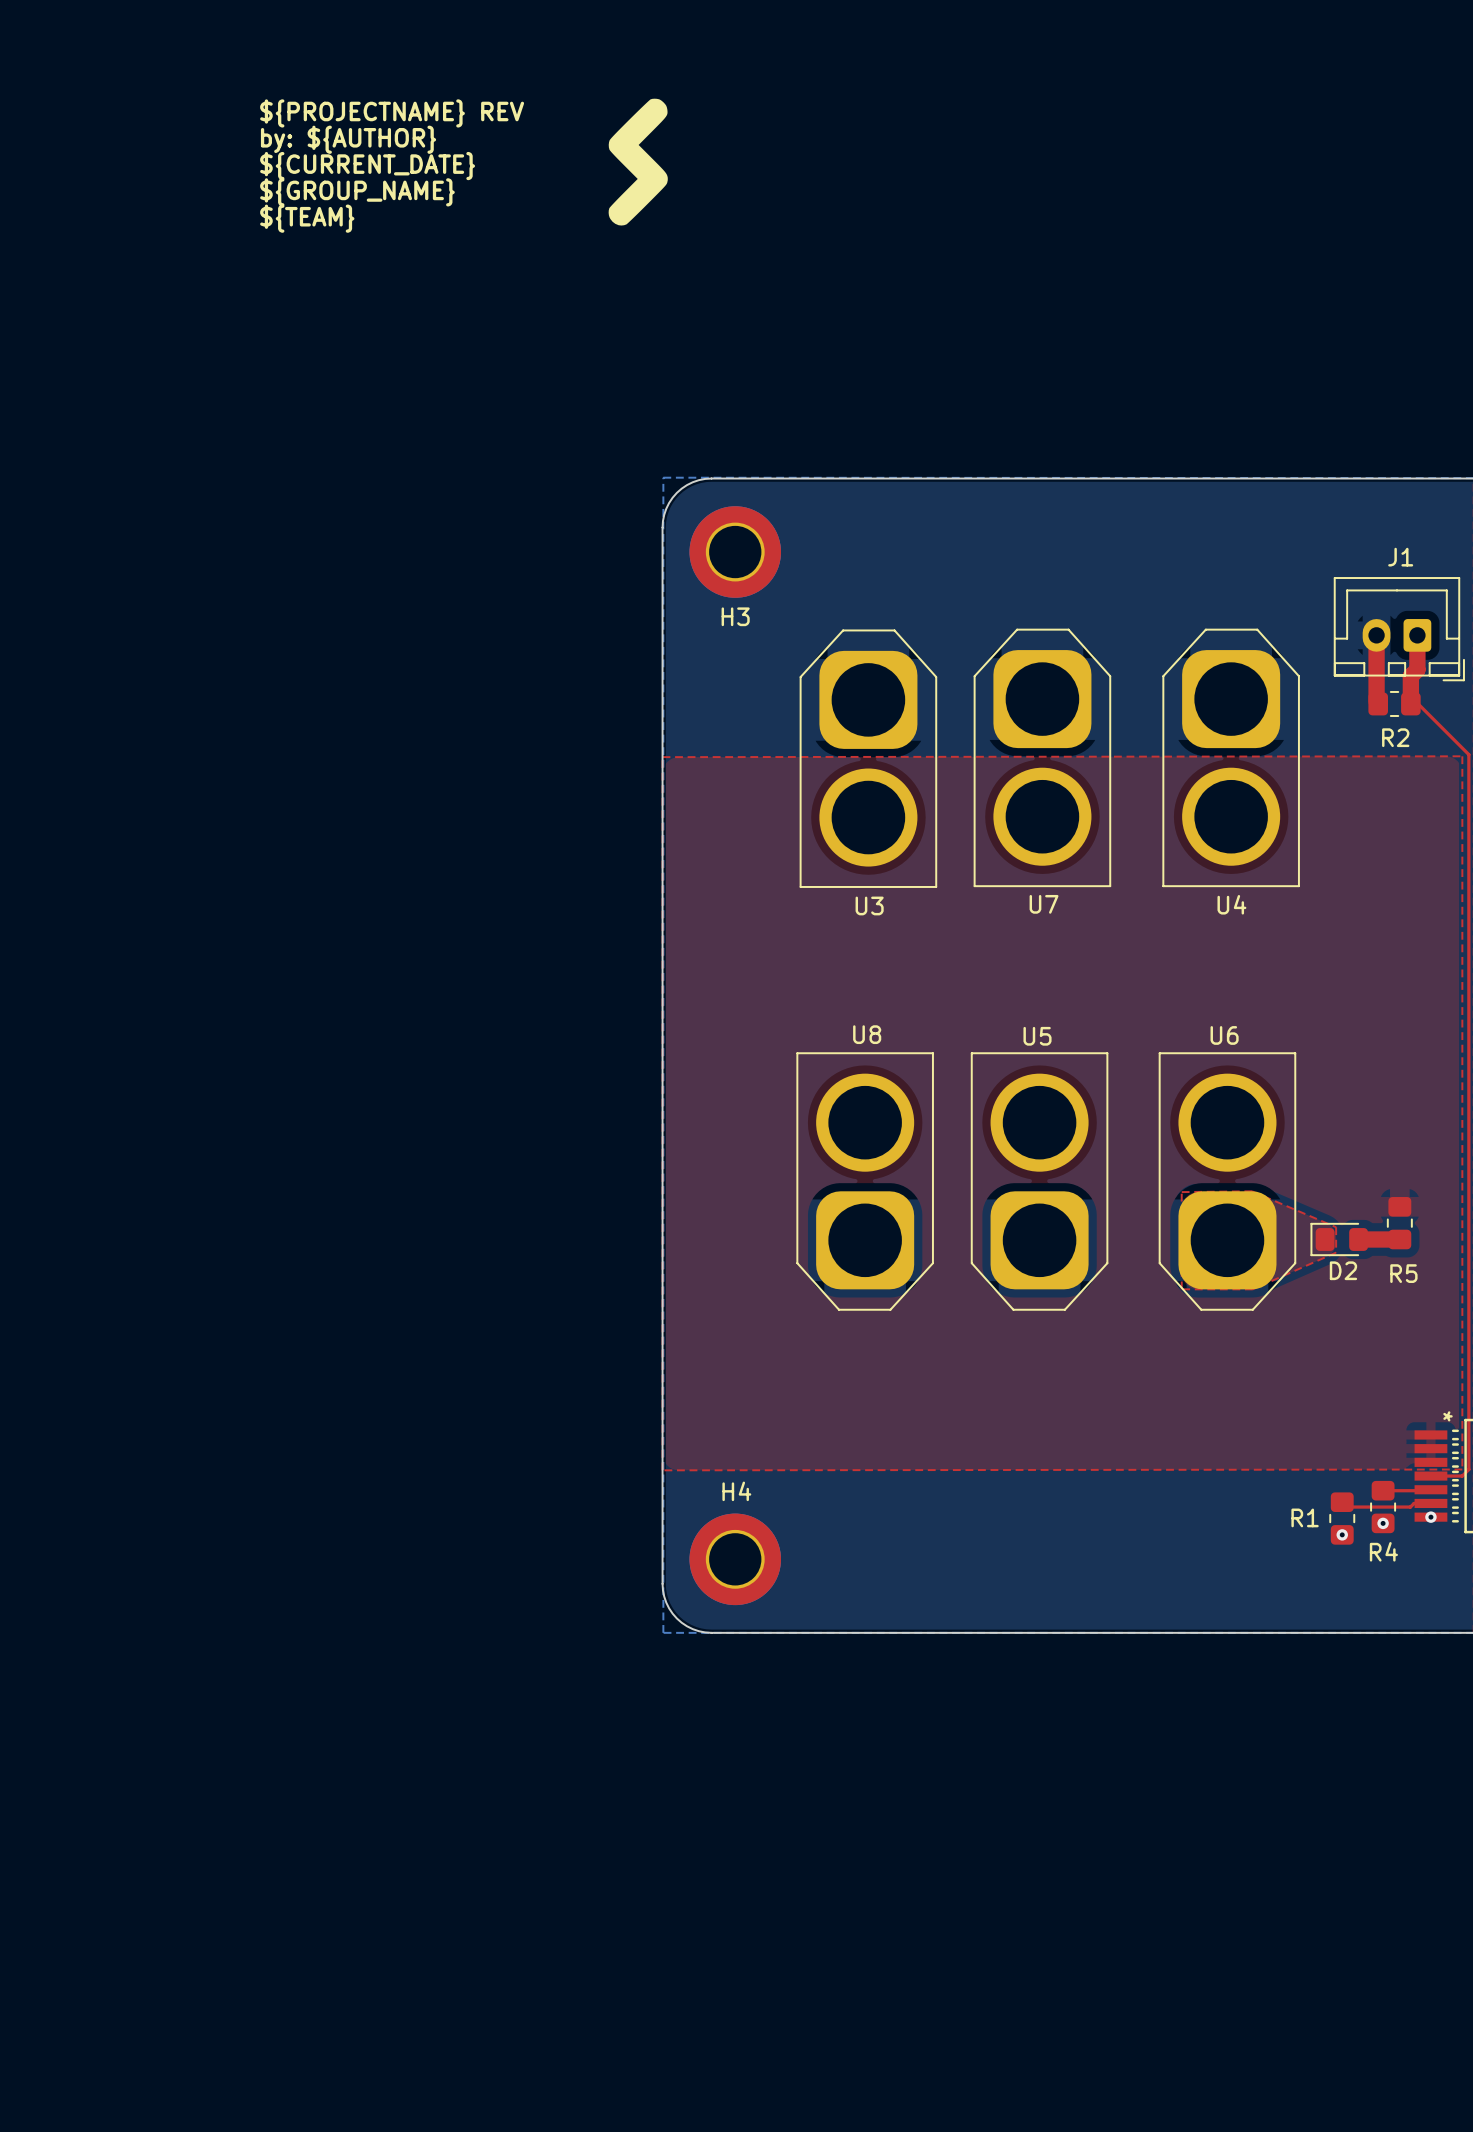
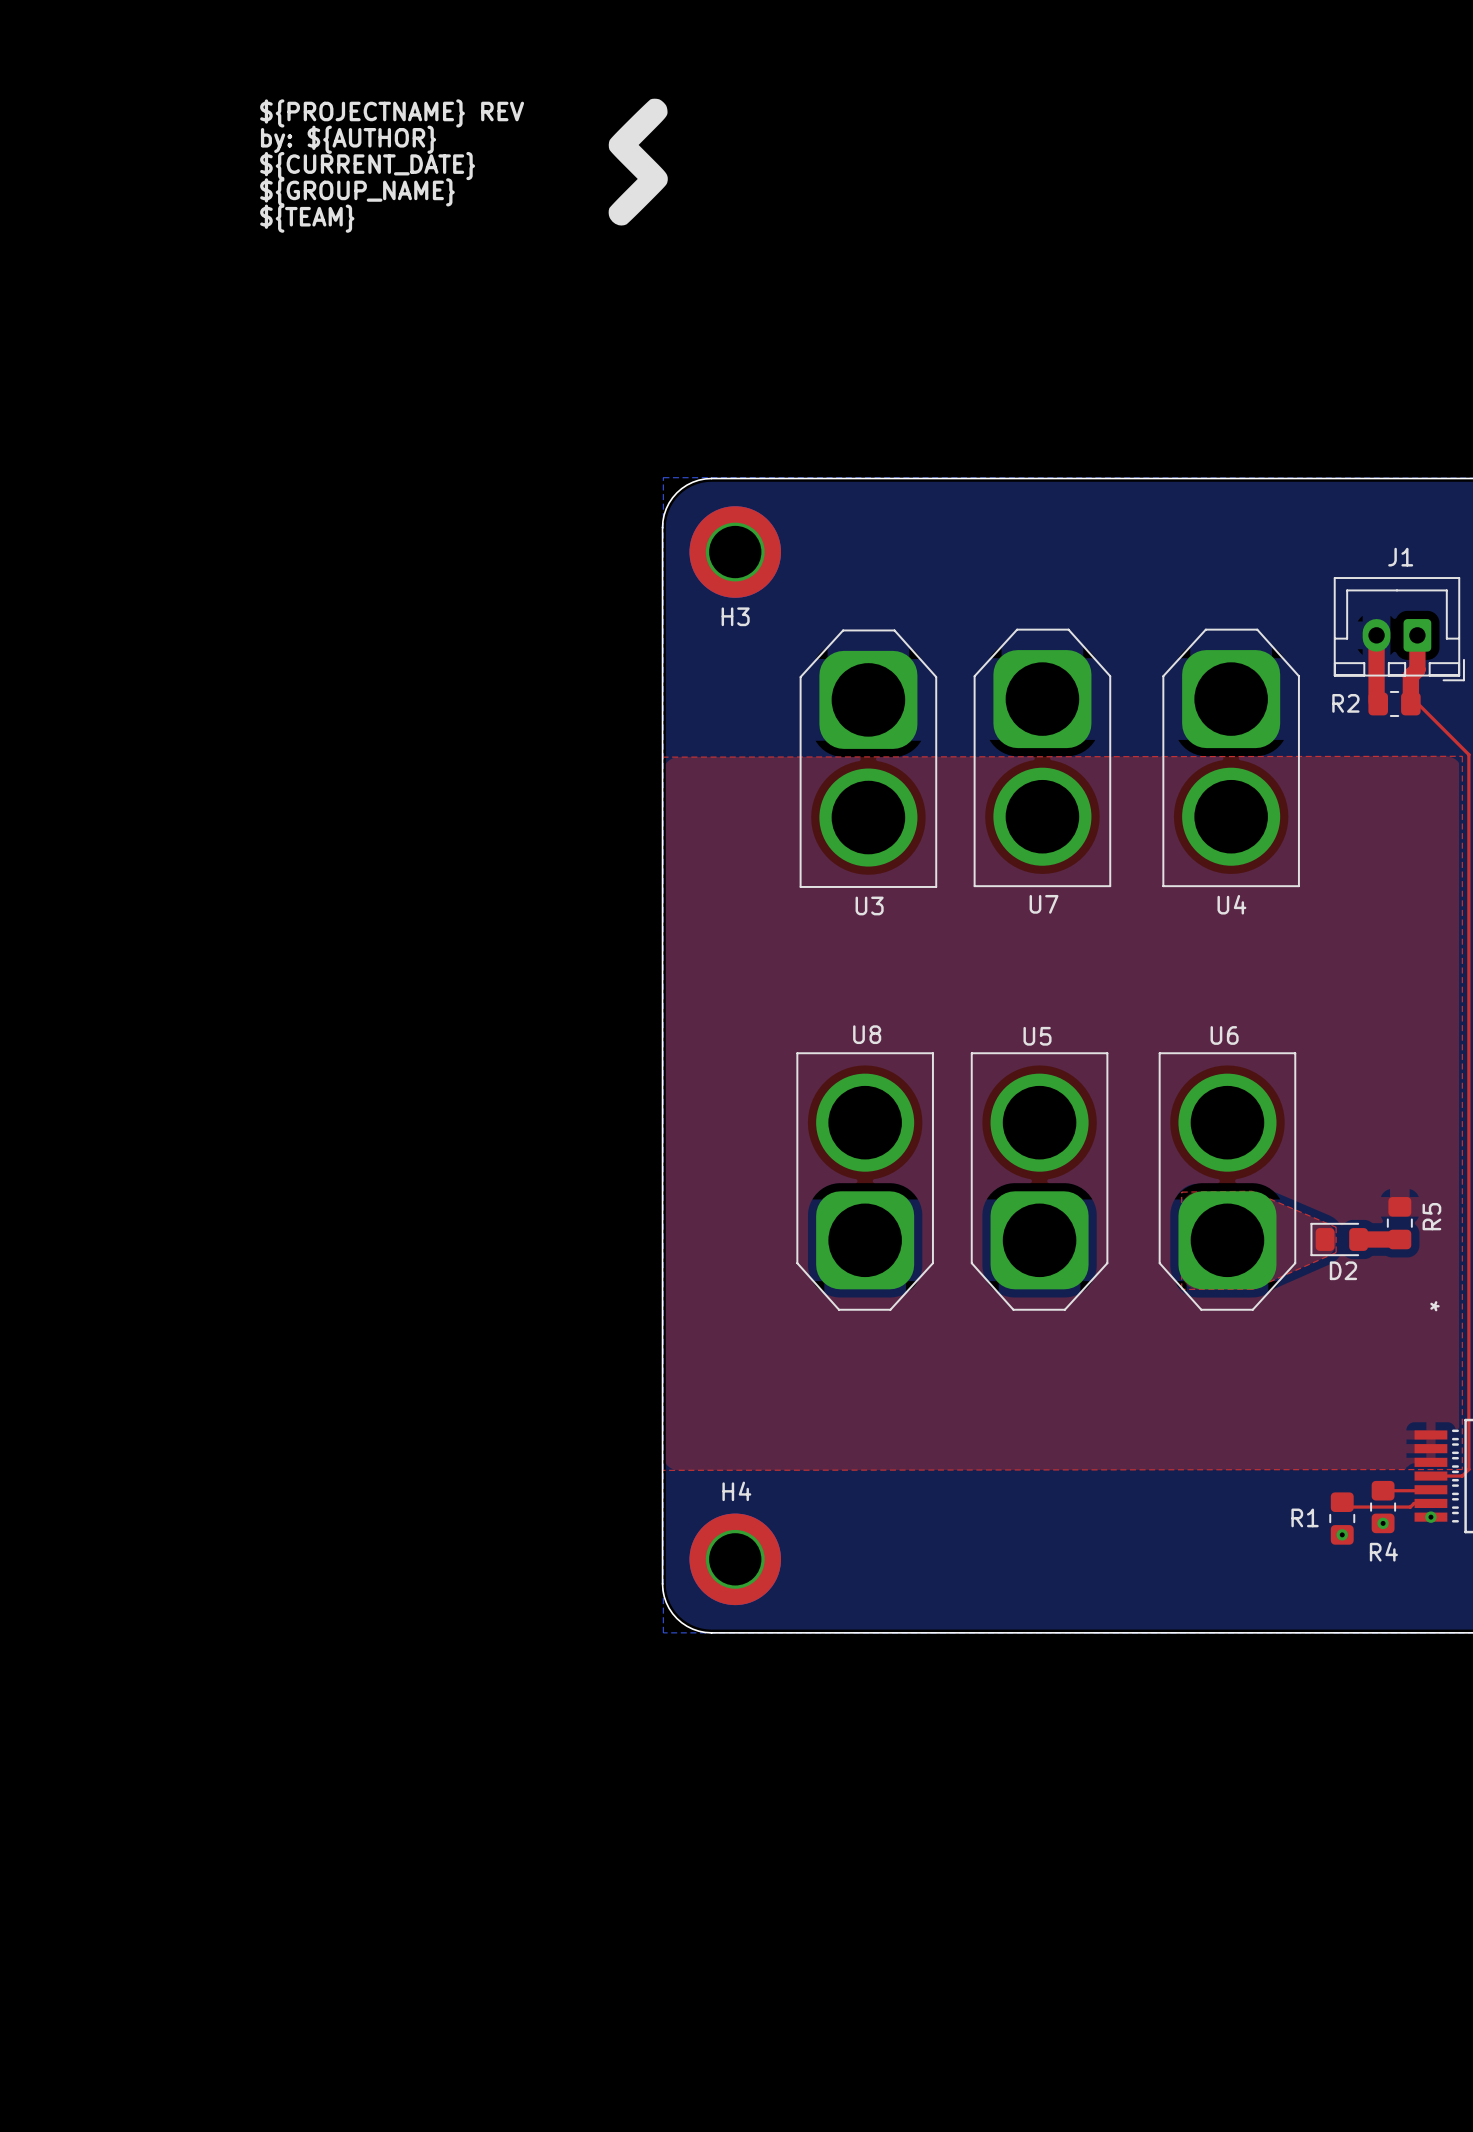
R2 name position: R2 (1395, 737) -> R2 (1345, 703)
R5 name rotation: 0° (1403, 1273) -> 90° counterclockwise (1431, 1216)
R5 name position: R5 (1403, 1273) -> R5 (1431, 1216)
part text position: * (1448, 1416) -> * (1435, 1306)

